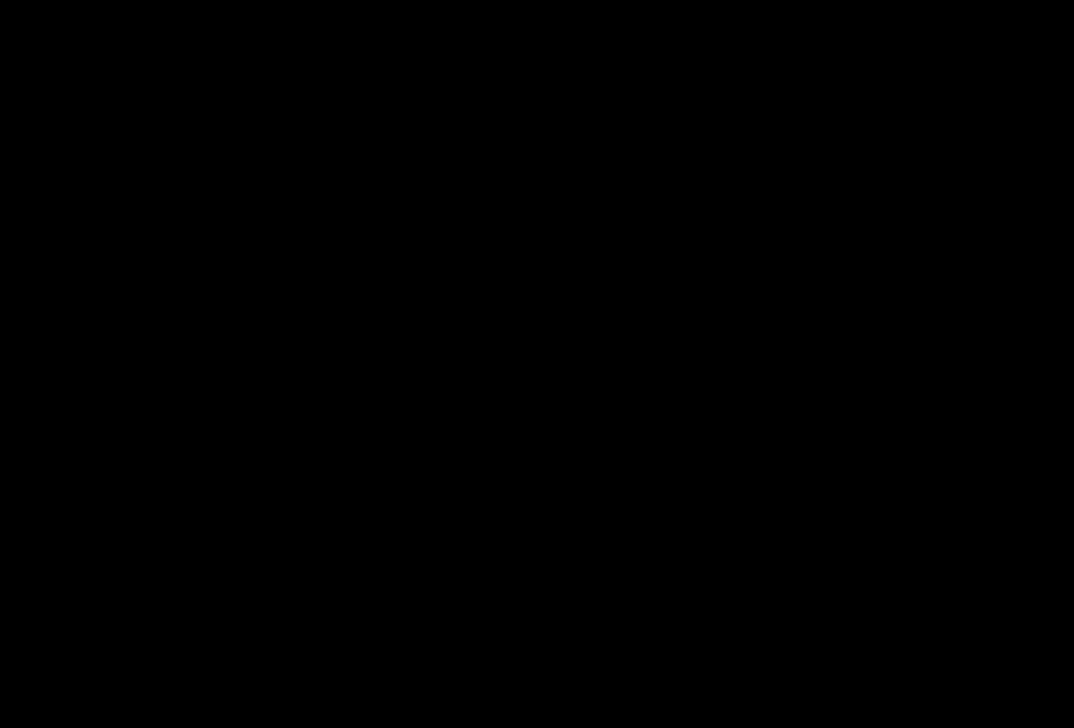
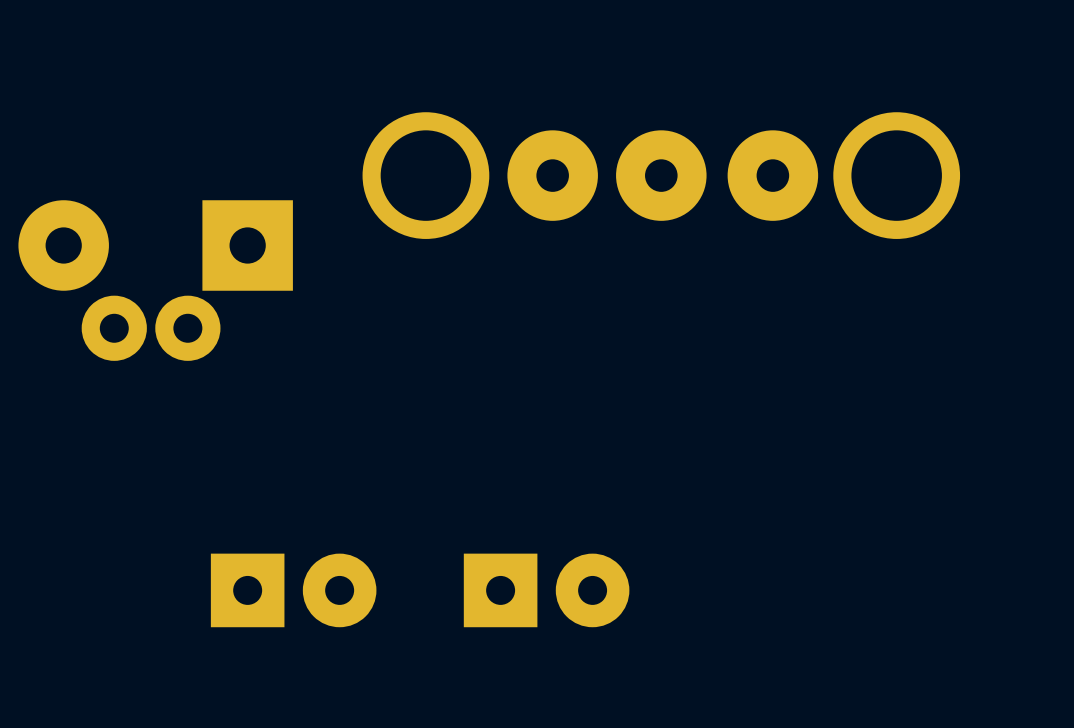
part: none -> (661, 175)
part: none -> (155, 280)
part: none -> (293, 590)
part: none -> (546, 590)

